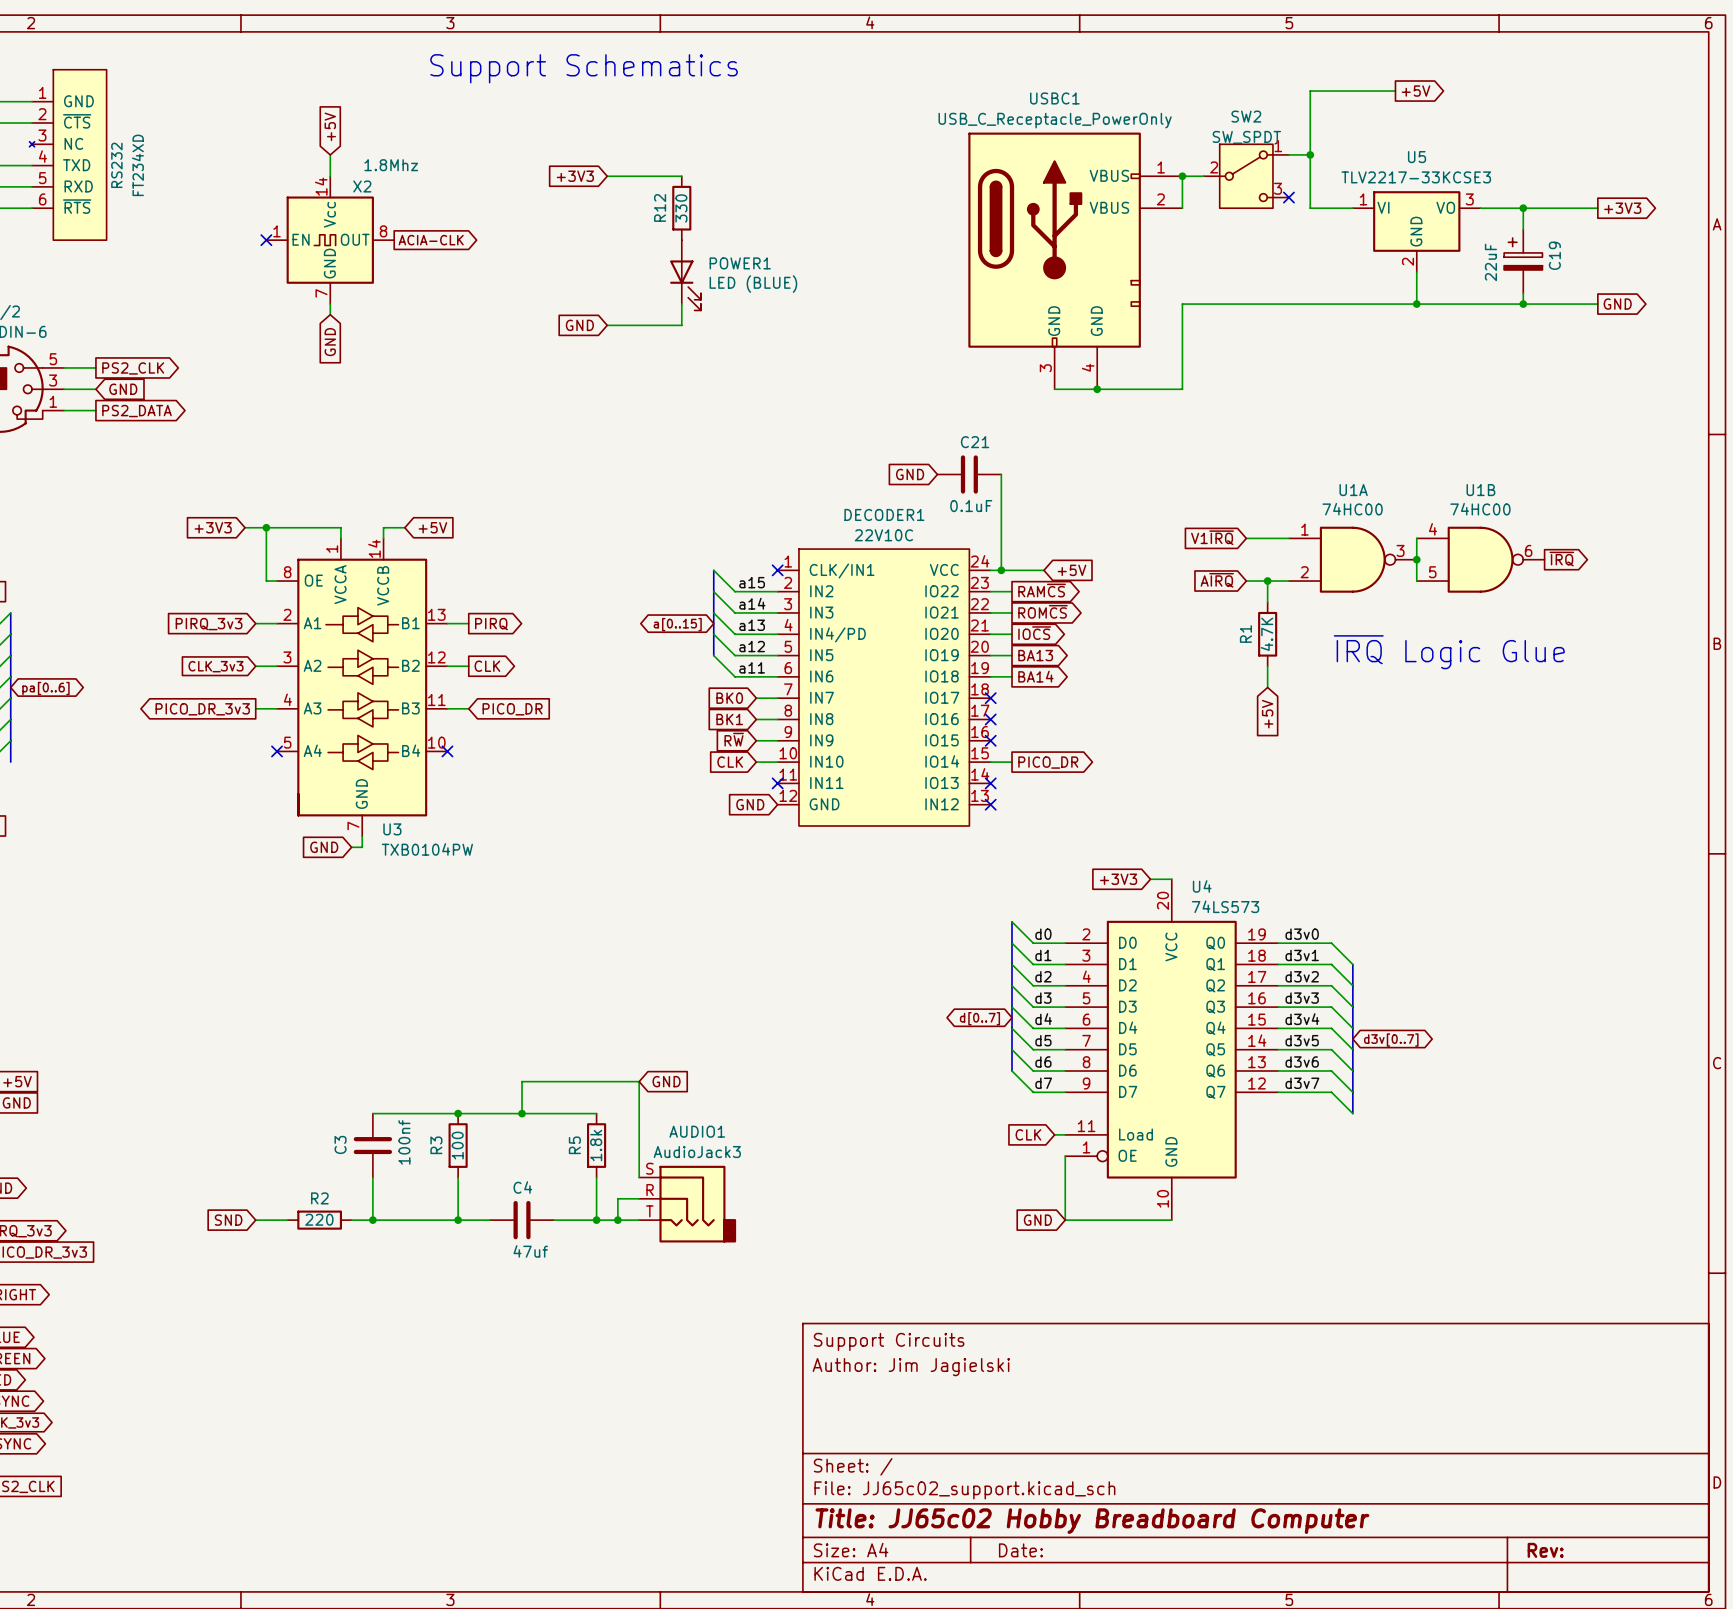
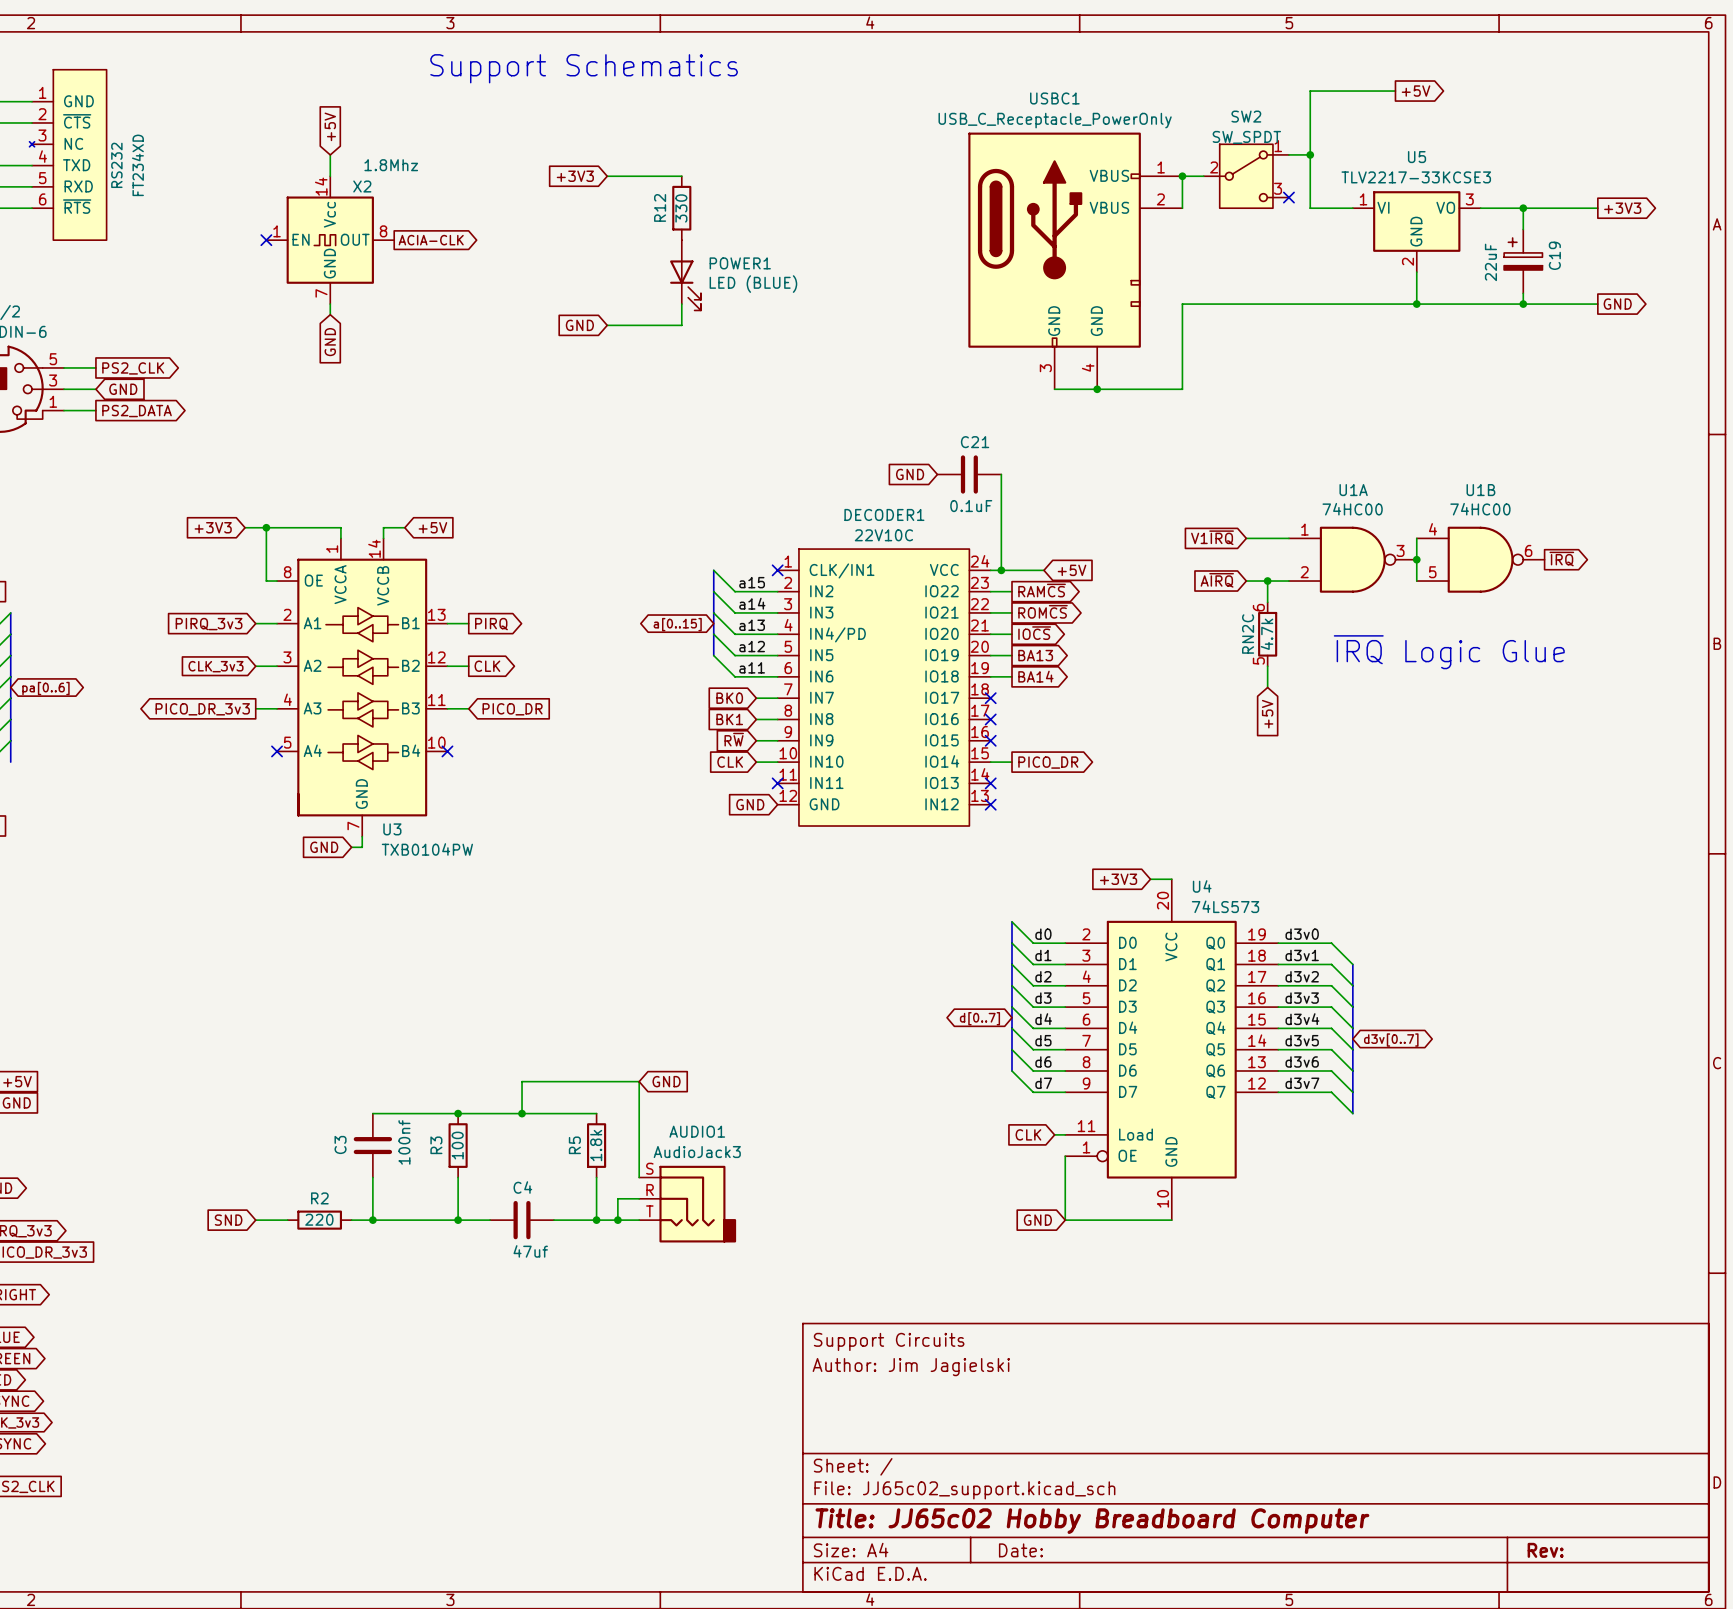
R1 pin number: none -> 6 (1258, 607)
R1 name: R1 (1245, 634) -> RN2C (1248, 634)
R1 value: 4.7K (1266, 634) -> 4.7k (1266, 634)
R1 pin number: none -> 5 (1258, 660)

